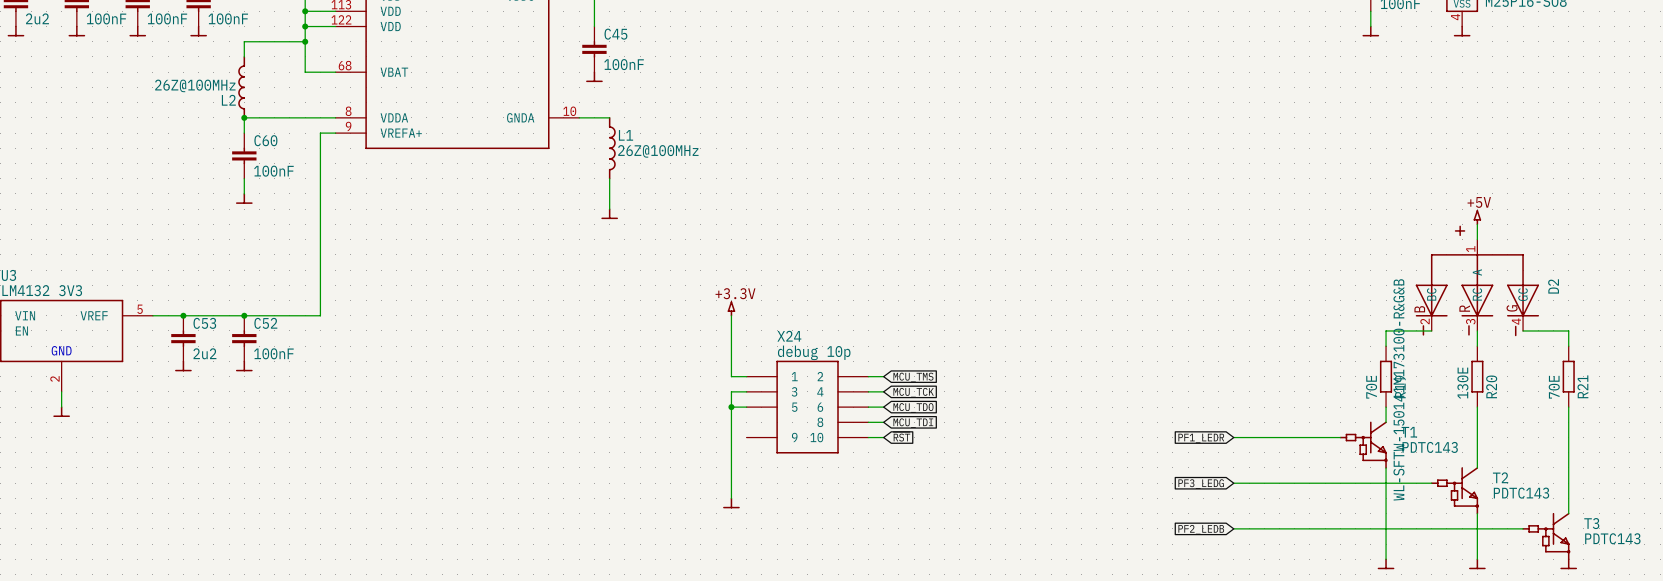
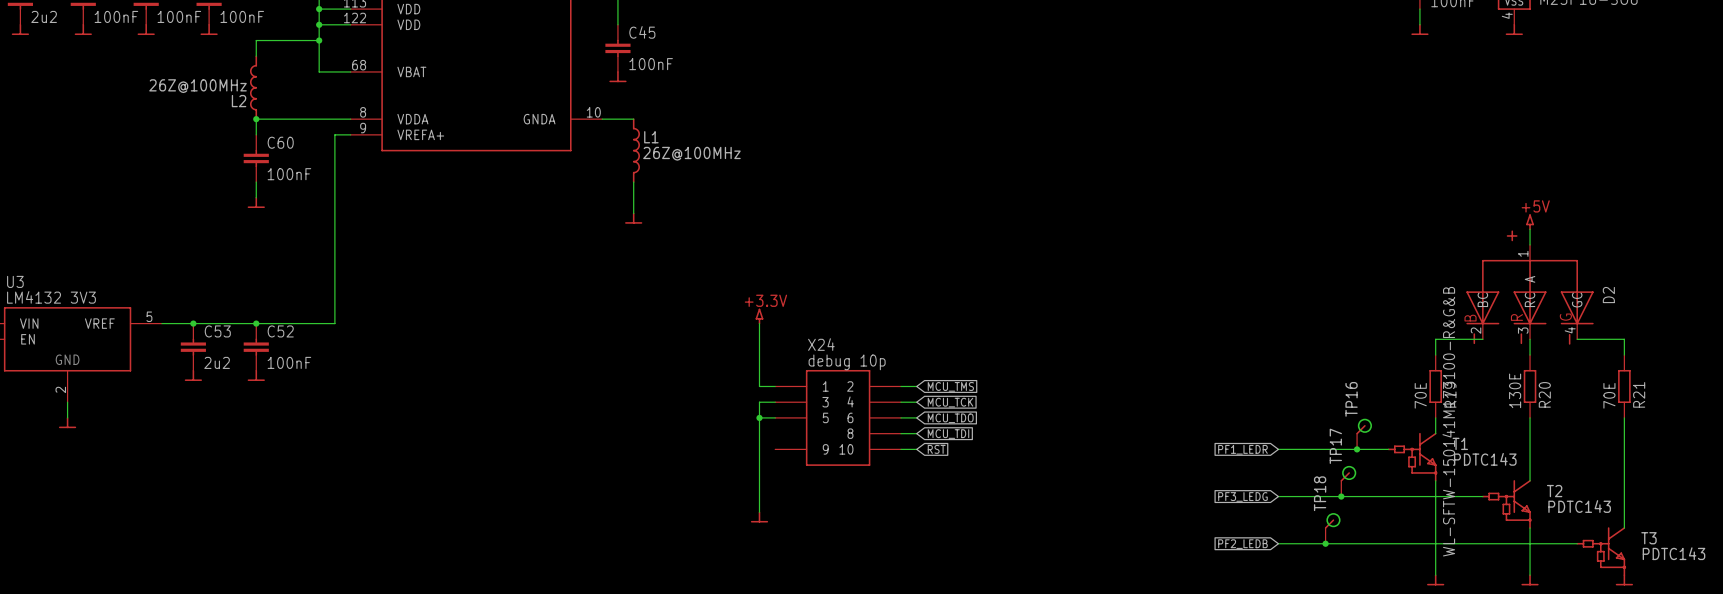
TP16: none -> (1364, 434)
junction: none -> (1357, 449)
TP17: none -> (1348, 481)
junction: none -> (1341, 496)
TP18: none -> (1332, 528)
junction: none -> (1325, 543)

